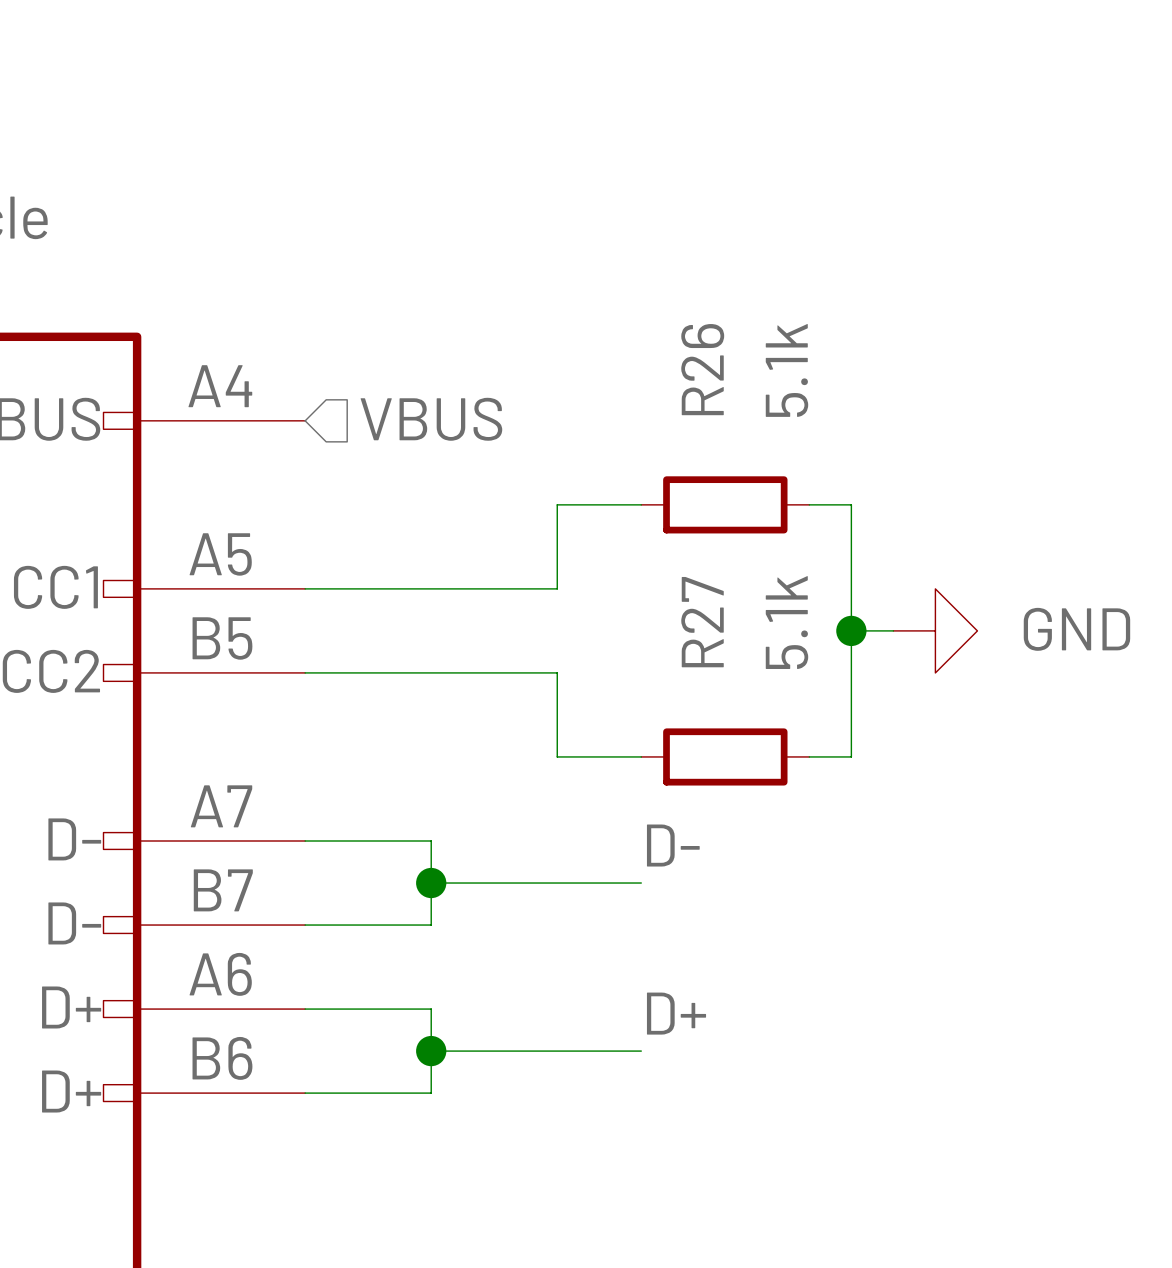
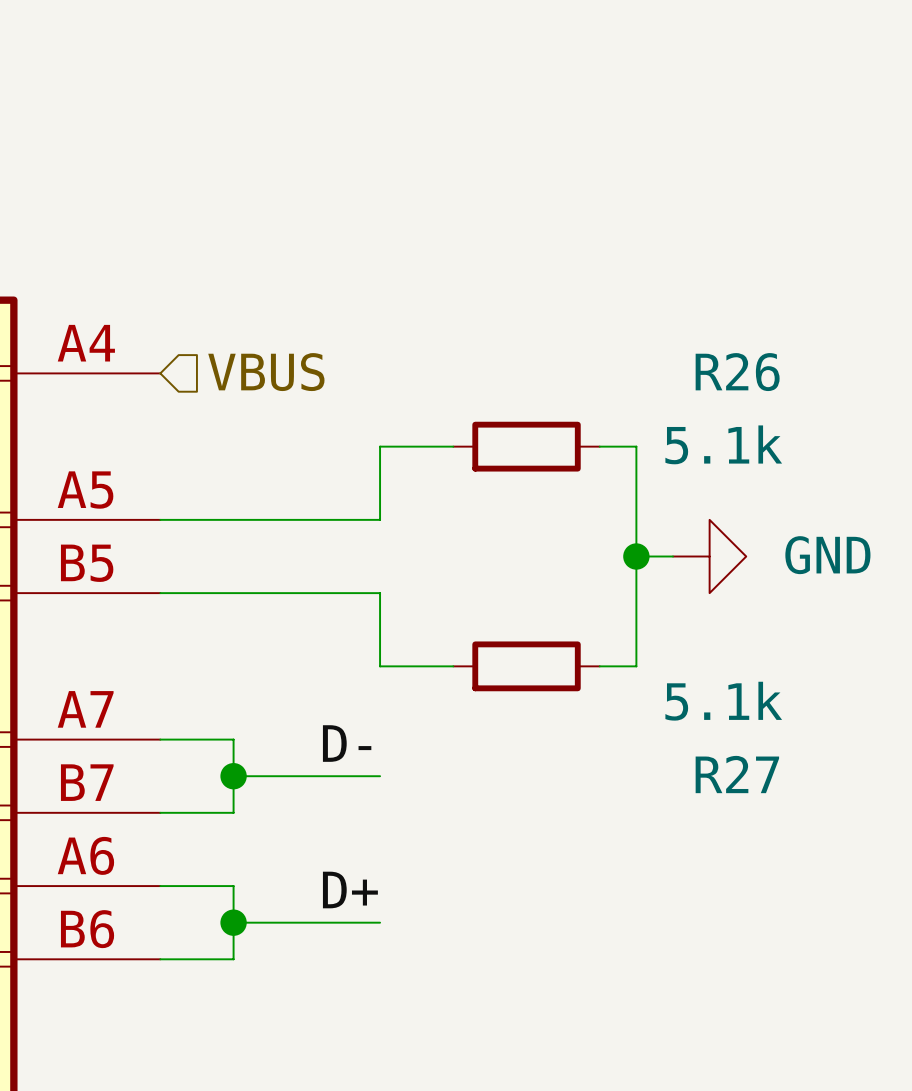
R26 name rotation: 0° (702, 369) -> 90° clockwise (737, 372)
R26 name position: R26 (702, 369) -> R26 (737, 372)
R26 value rotation: 0° (786, 370) -> 90° clockwise (723, 444)
R26 value position: 5.1k (786, 370) -> 5.1k (723, 444)
R27 name rotation: 0° (702, 622) -> 90° clockwise (737, 774)
R27 name position: R27 (702, 622) -> R27 (737, 774)
R27 value rotation: 0° (786, 622) -> 90° clockwise (723, 701)
R27 value position: 5.1k (786, 622) -> 5.1k (723, 701)
wire: (389, 841) (431, 841) (431, 925) (389, 925) -> (233, 739) (233, 812)
label position: D- (673, 845) -> D- (347, 743)
wire: none -> (233, 776) (270, 776)
junction position: (431, 883) -> (233, 776)
wire: (557, 883) (641, 883) -> none
wire: (389, 1009) (431, 1009) (431, 1093) (389, 1093) -> (233, 886) (233, 959)
label position: D+ (676, 1013) -> D+ (350, 890)
wire: none -> (233, 922) (270, 922)
junction position: (431, 1051) -> (233, 922)
wire: (557, 1051) (641, 1051) -> none

